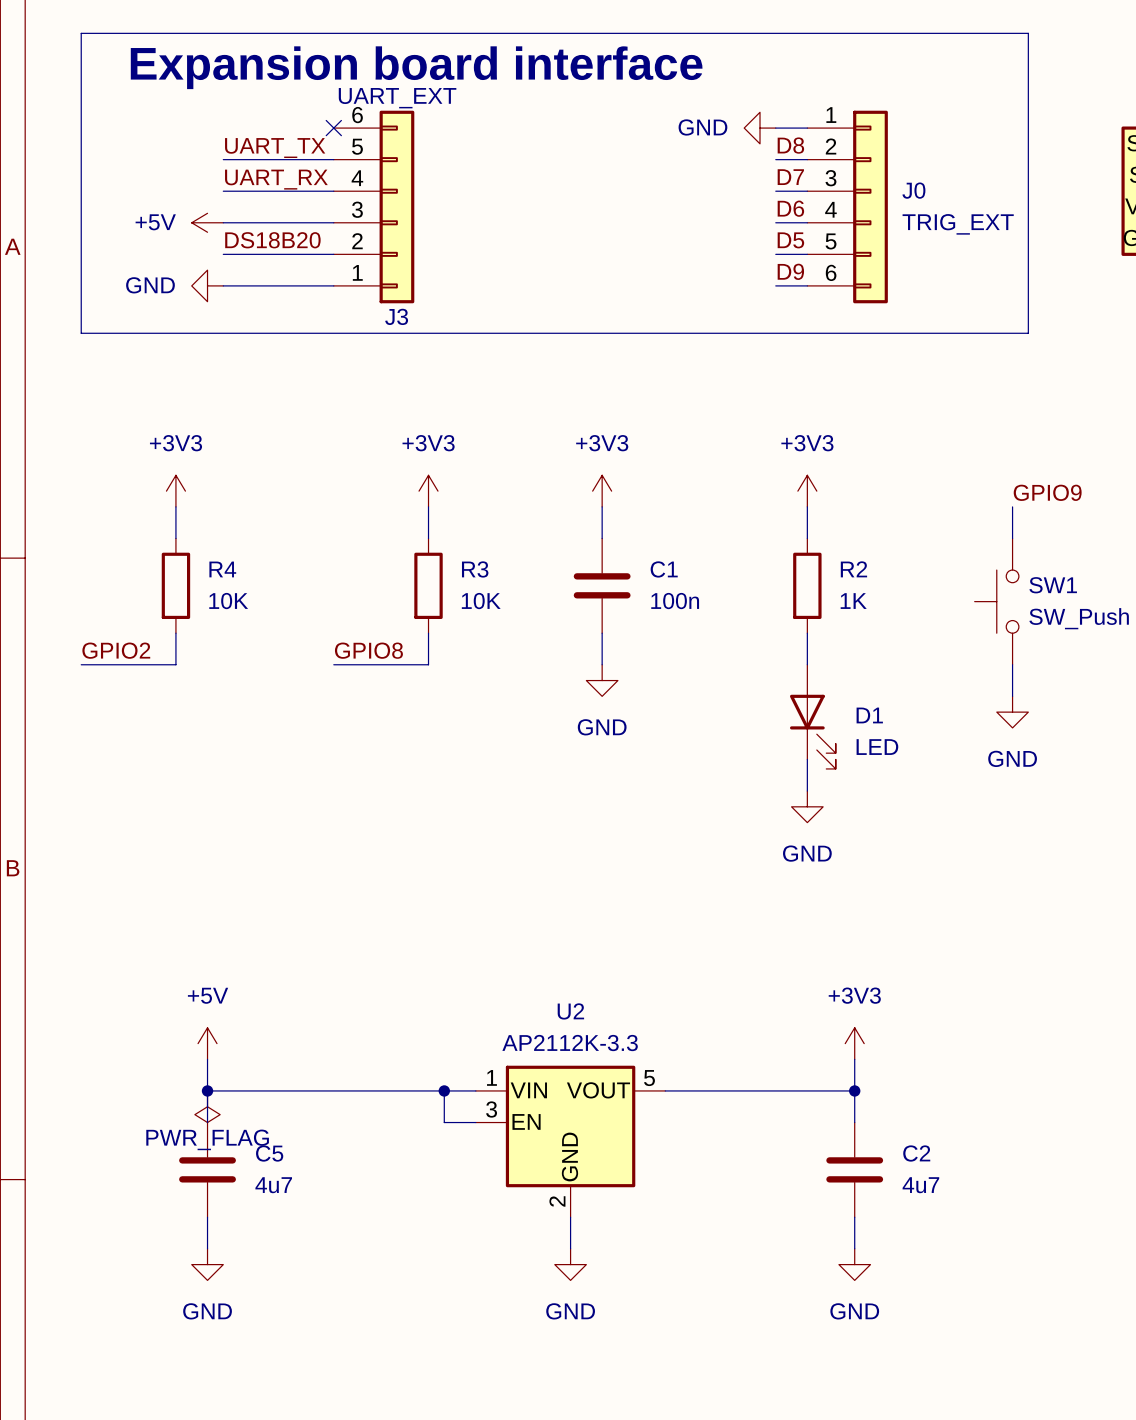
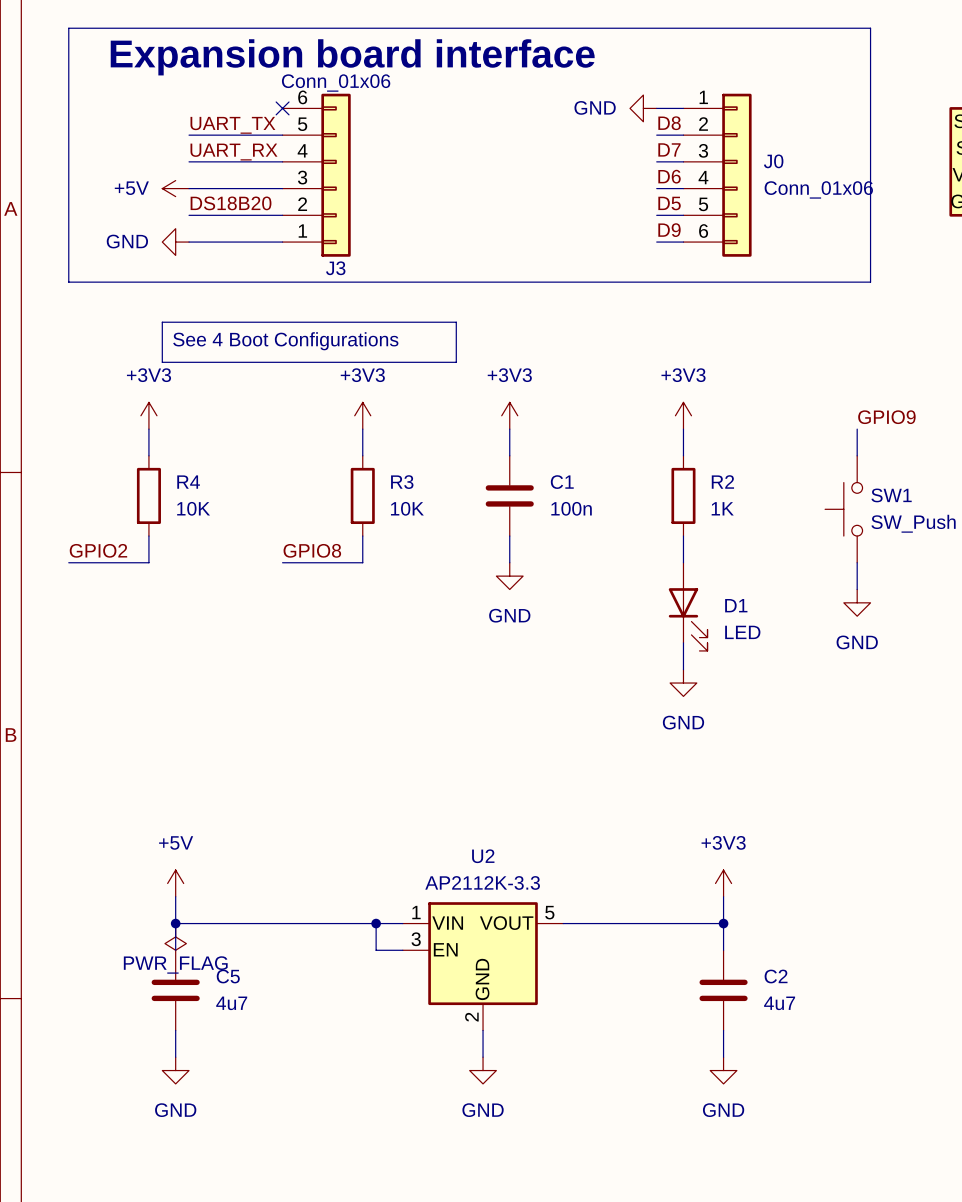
J3 value: UART_EXT (397, 98) -> Conn_01x06 (336, 83)
J0 value: TRIG_EXT (958, 224) -> Conn_01x06 (818, 189)
line: none -> (162, 322) (456, 322) (456, 362) (162, 362) (162, 322)
text: none -> See 4 Boot Configurations (285, 341)

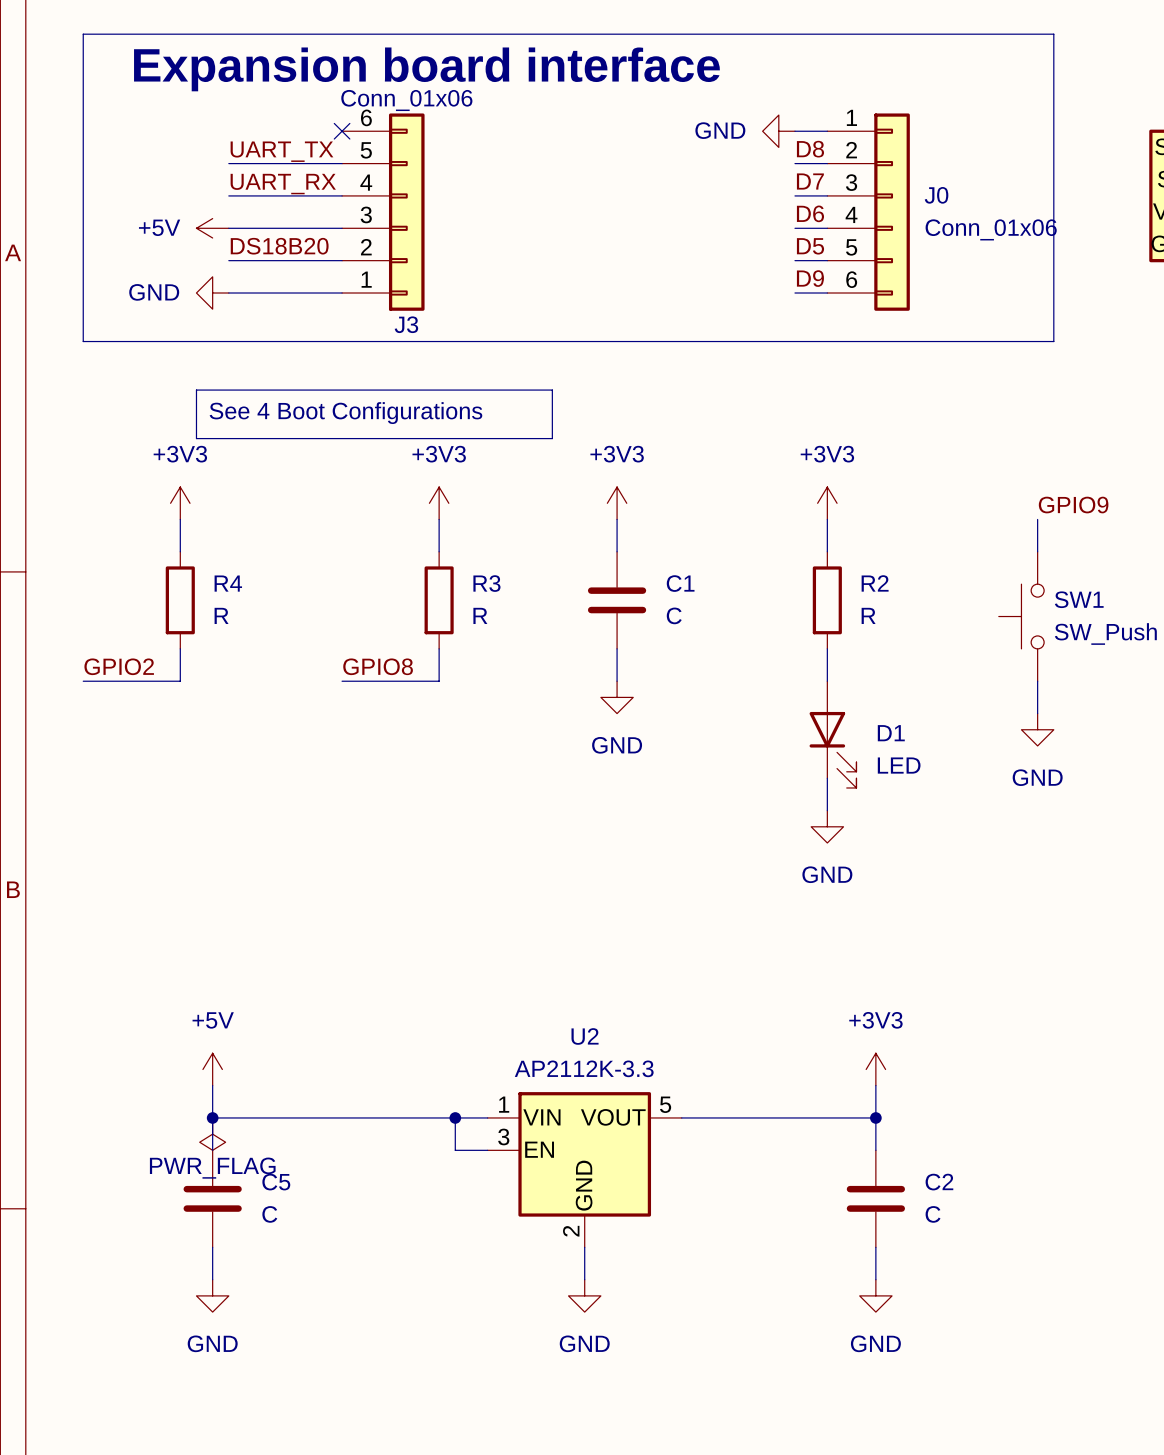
R4 value: 10K (193, 508) -> R (221, 615)
R3 value: 10K (407, 508) -> R (480, 615)
C1 value: 100n (571, 508) -> C (674, 615)
R2 value: 1K (722, 508) -> R (868, 615)
C5 value: 4u7 (231, 1003) -> C (269, 1214)
C2 value: 4u7 (779, 1003) -> C (933, 1214)

